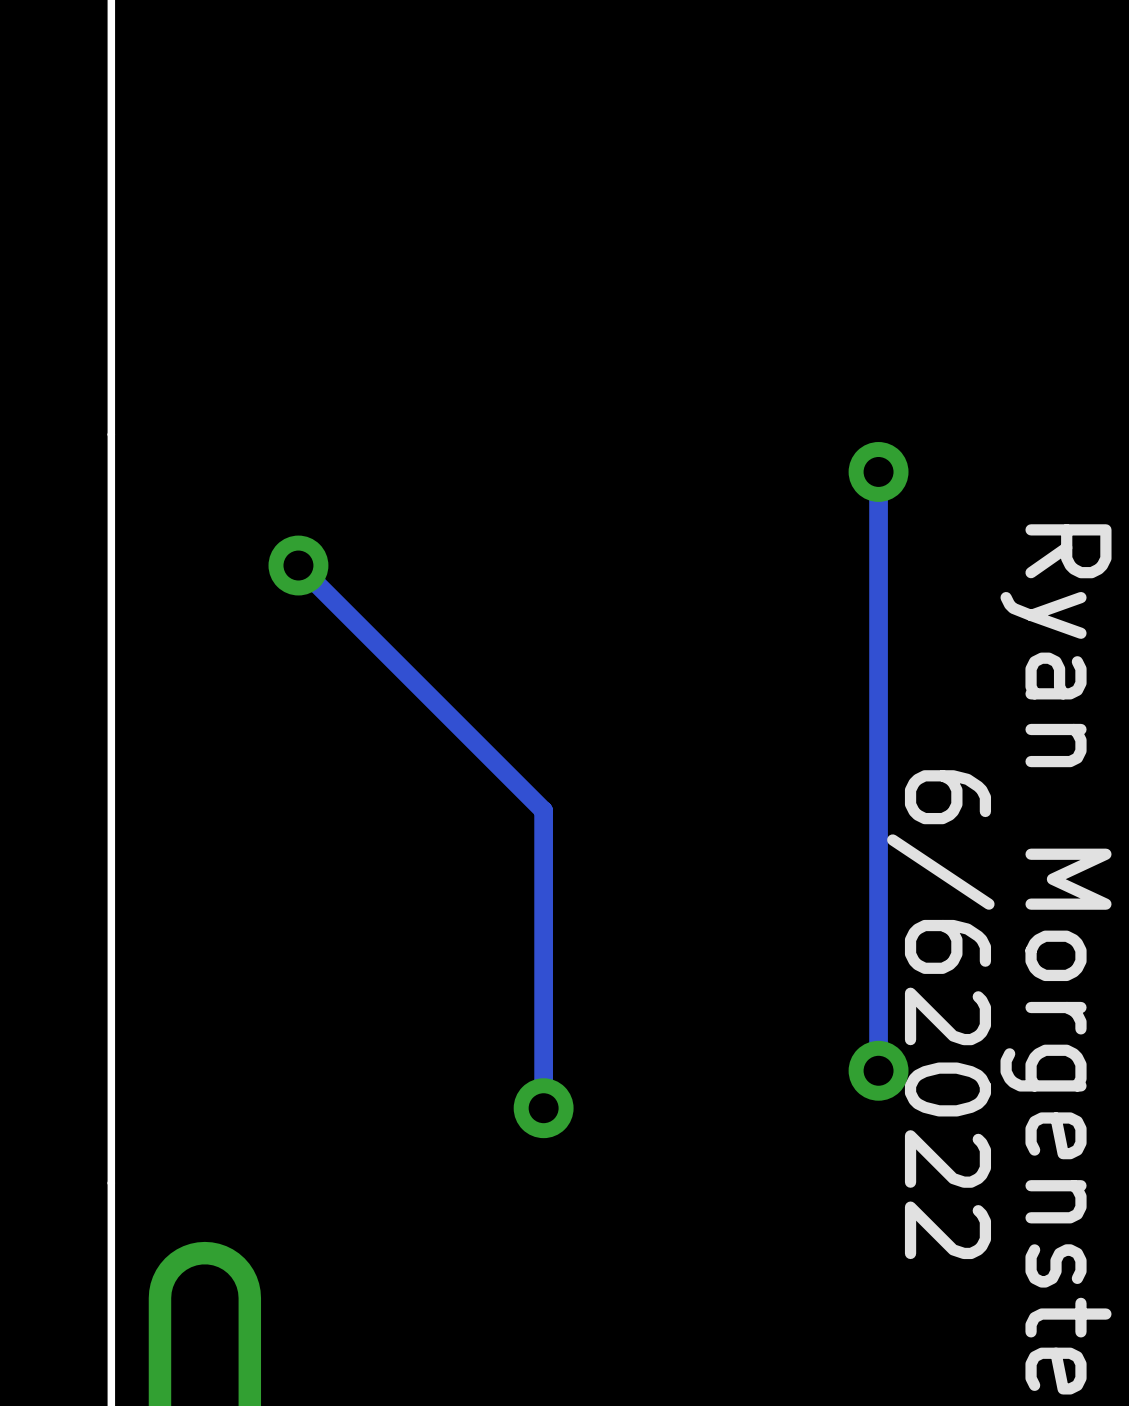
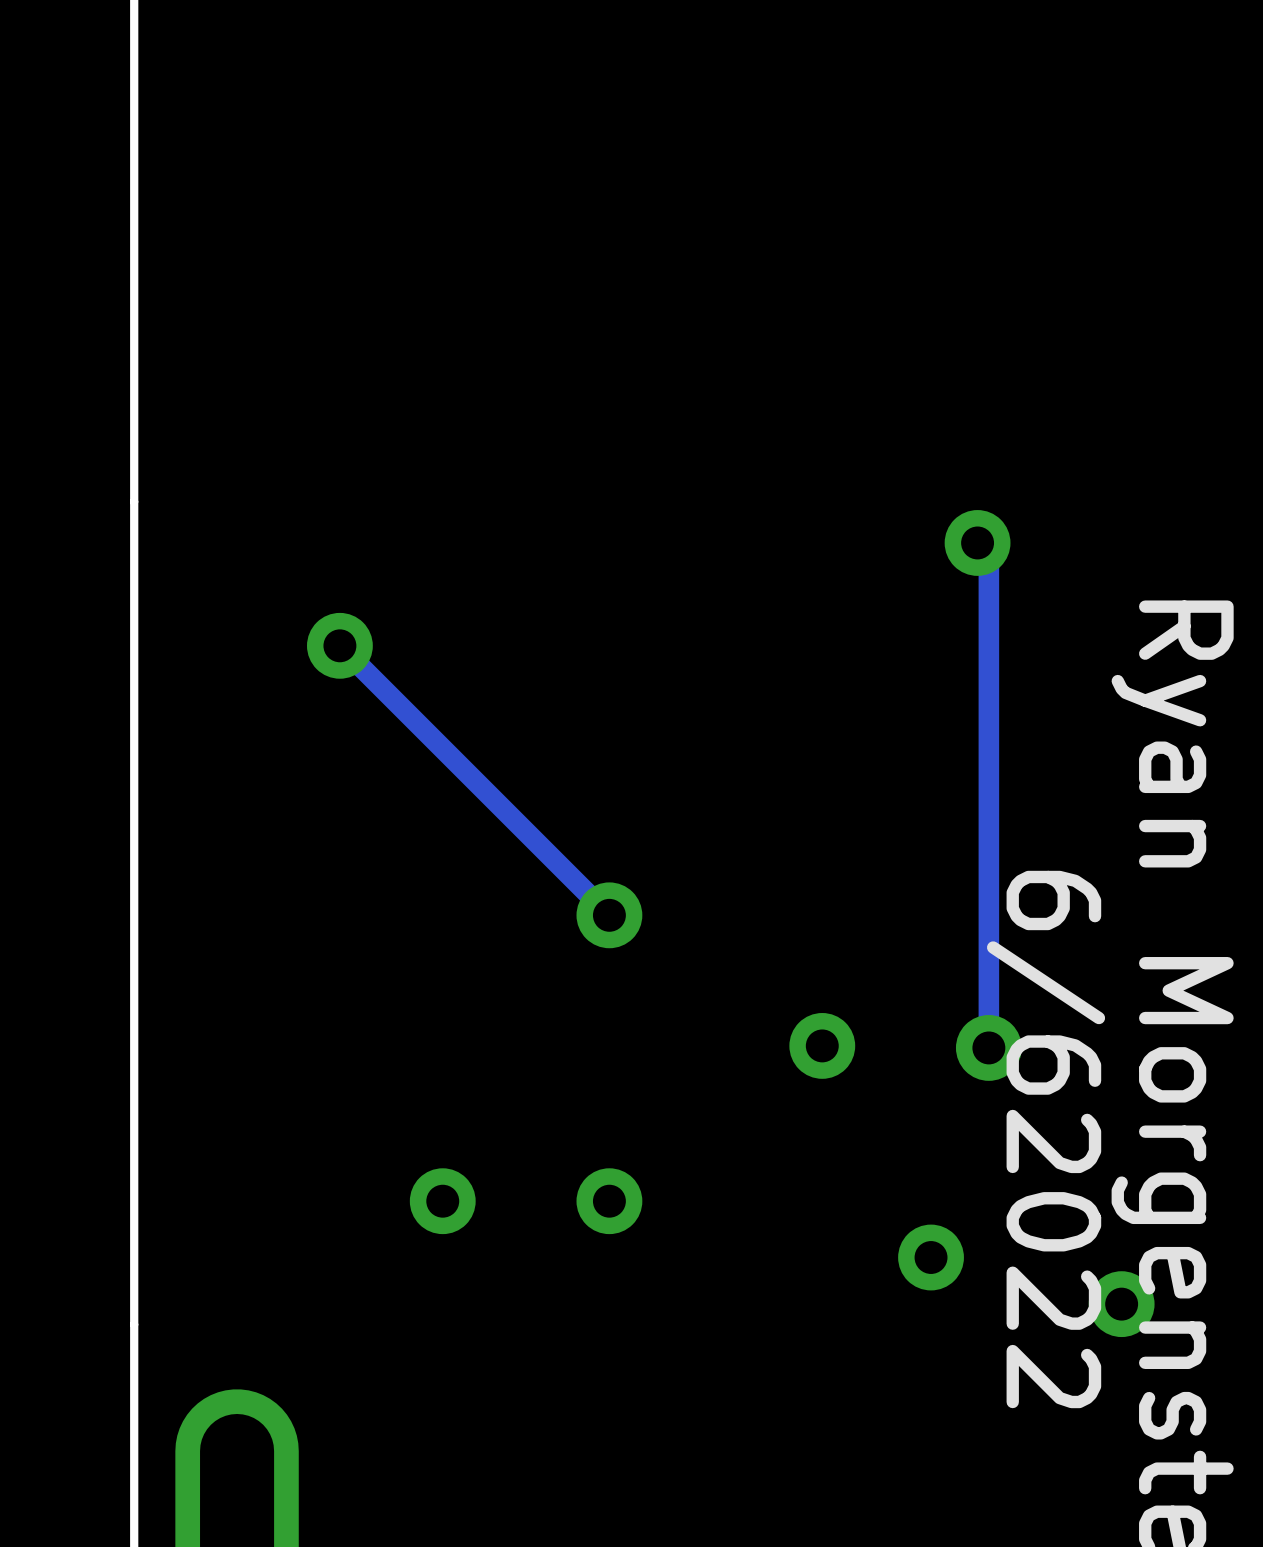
track: (878, 471) (878, 1070) -> (977, 542) (988, 554) (988, 1047)
track: (543, 810) (543, 1108) -> none
via: none -> (609, 915)
via: none -> (822, 1045)
via: none -> (988, 1047)
via: none -> (442, 1201)
via position: (878, 1070) -> (931, 1257)
via position: (543, 1108) -> (609, 1201)
via: none -> (1121, 1304)

